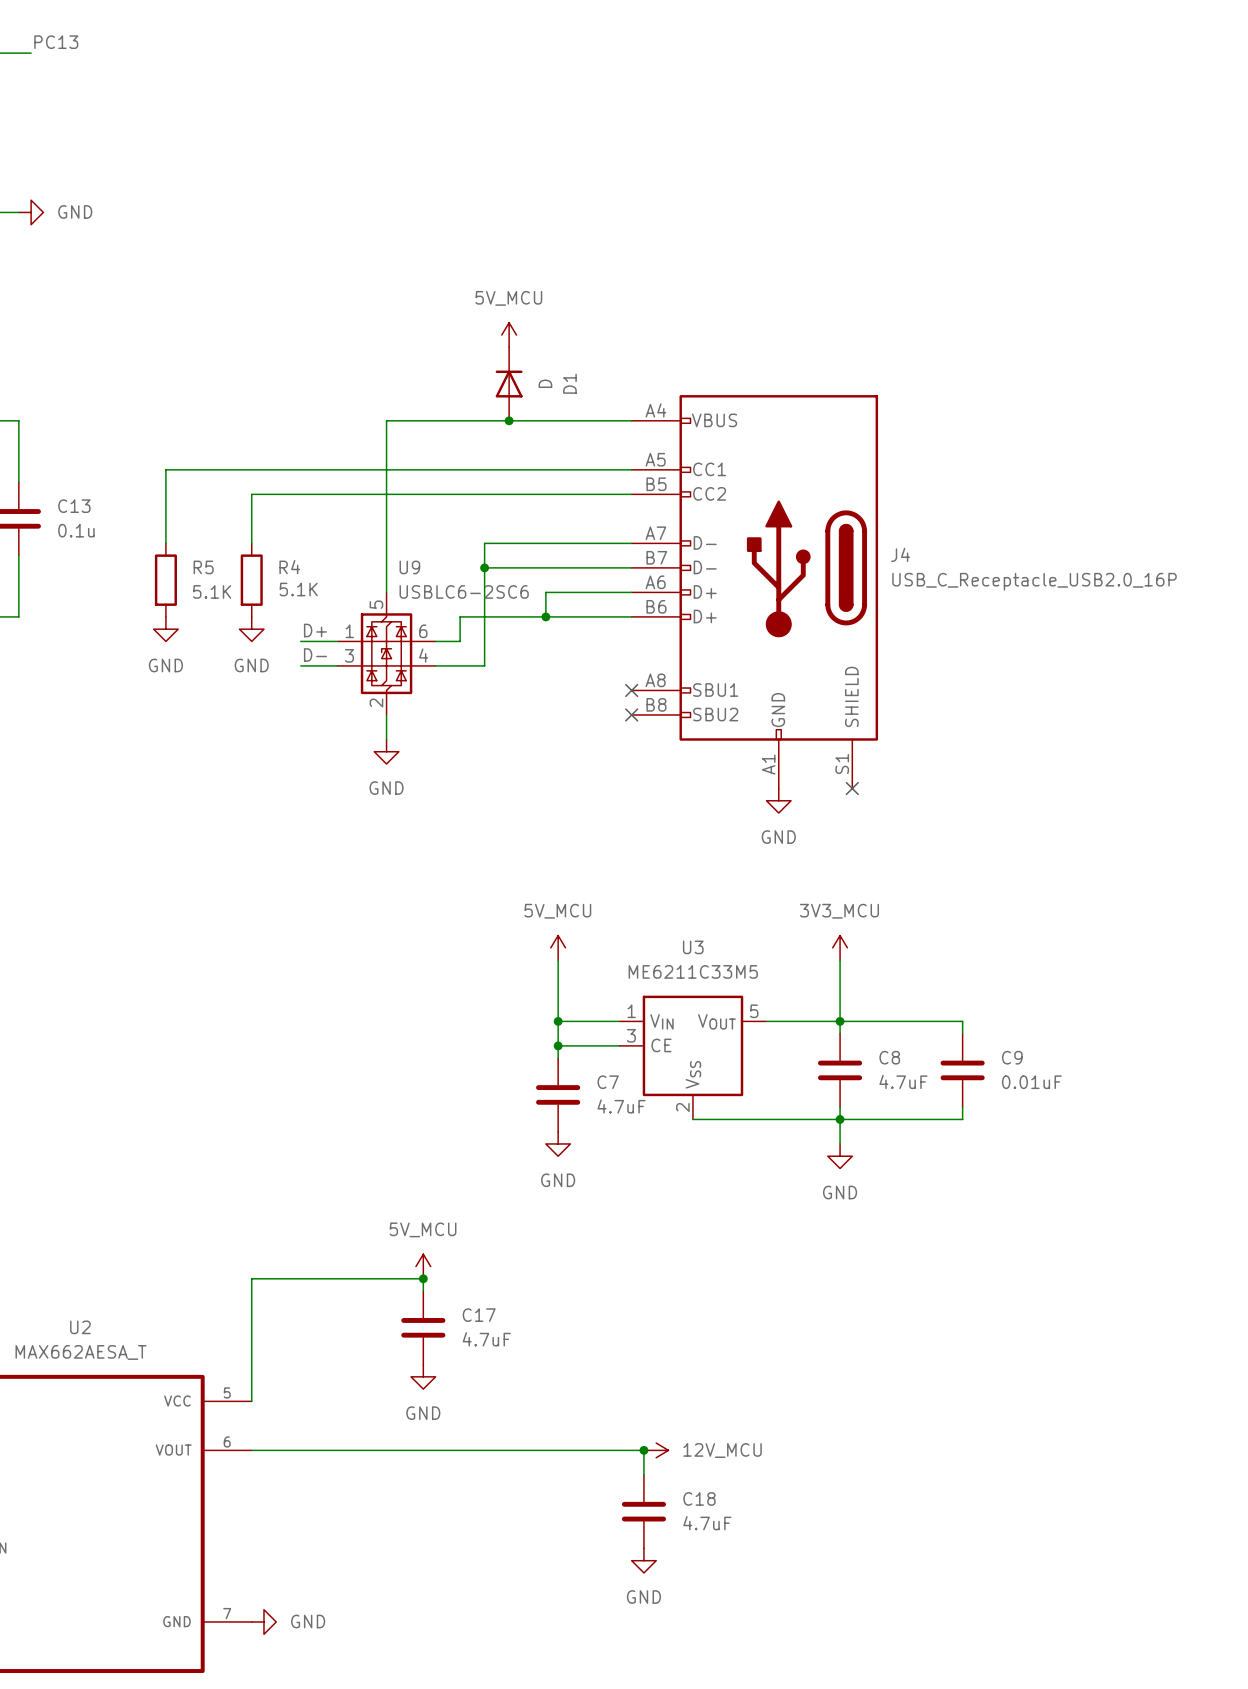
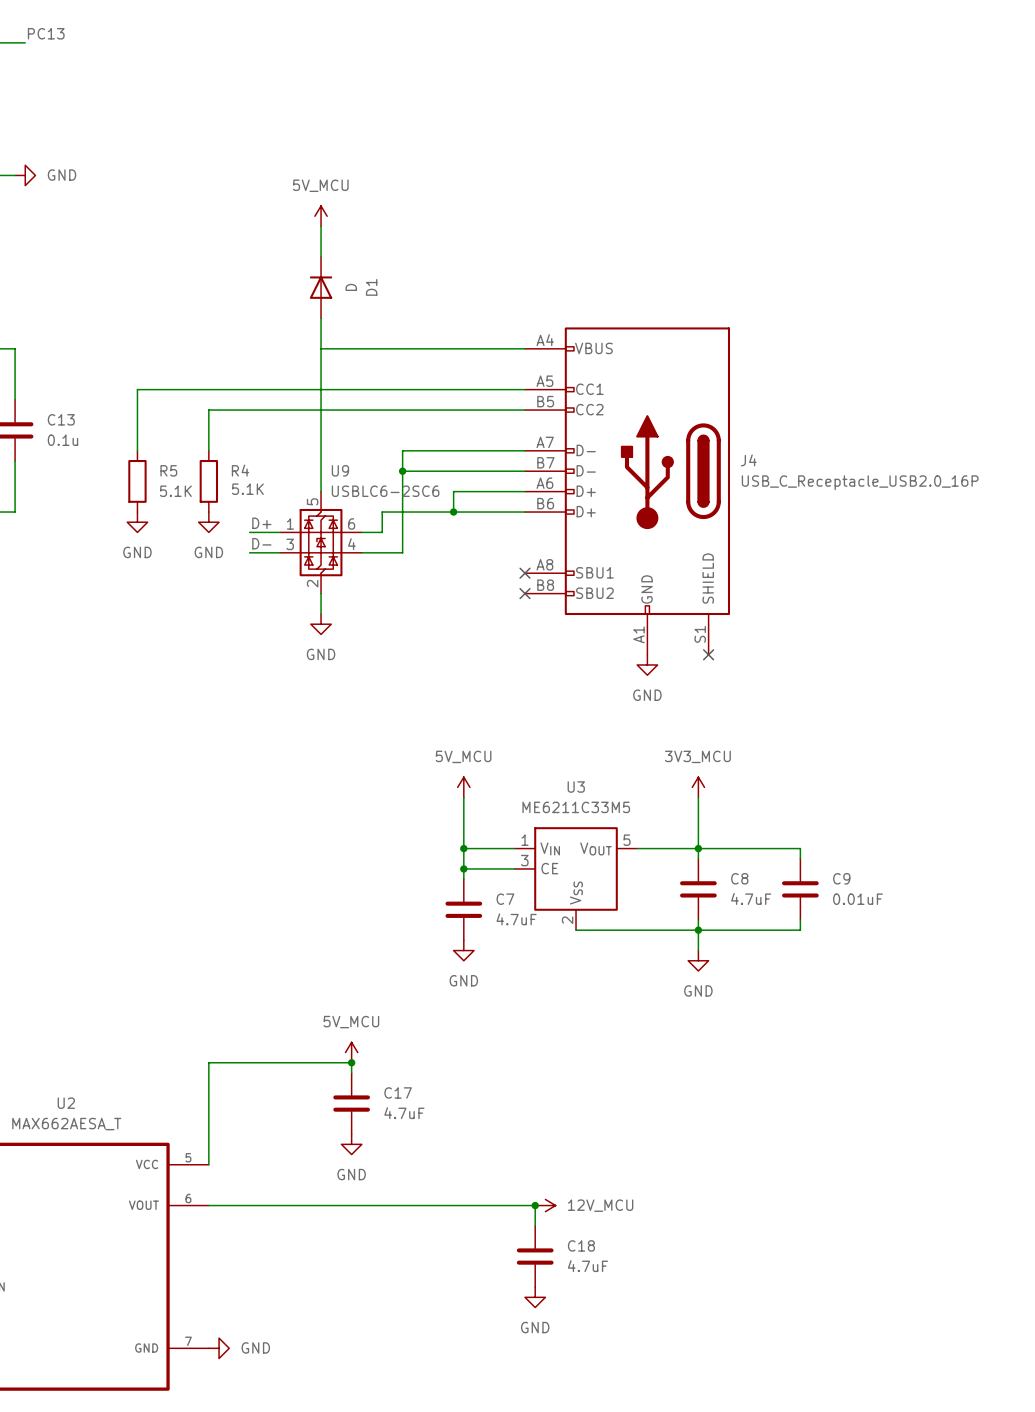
wire: none -> (321, 226) (321, 257)
power symbol position: 5V_MCU (509, 335) -> 5V_MCU (321, 216)
wire: none -> (321, 318) (321, 348)
D1 position: (509, 384) -> (321, 287)
junction: (509, 420) -> none

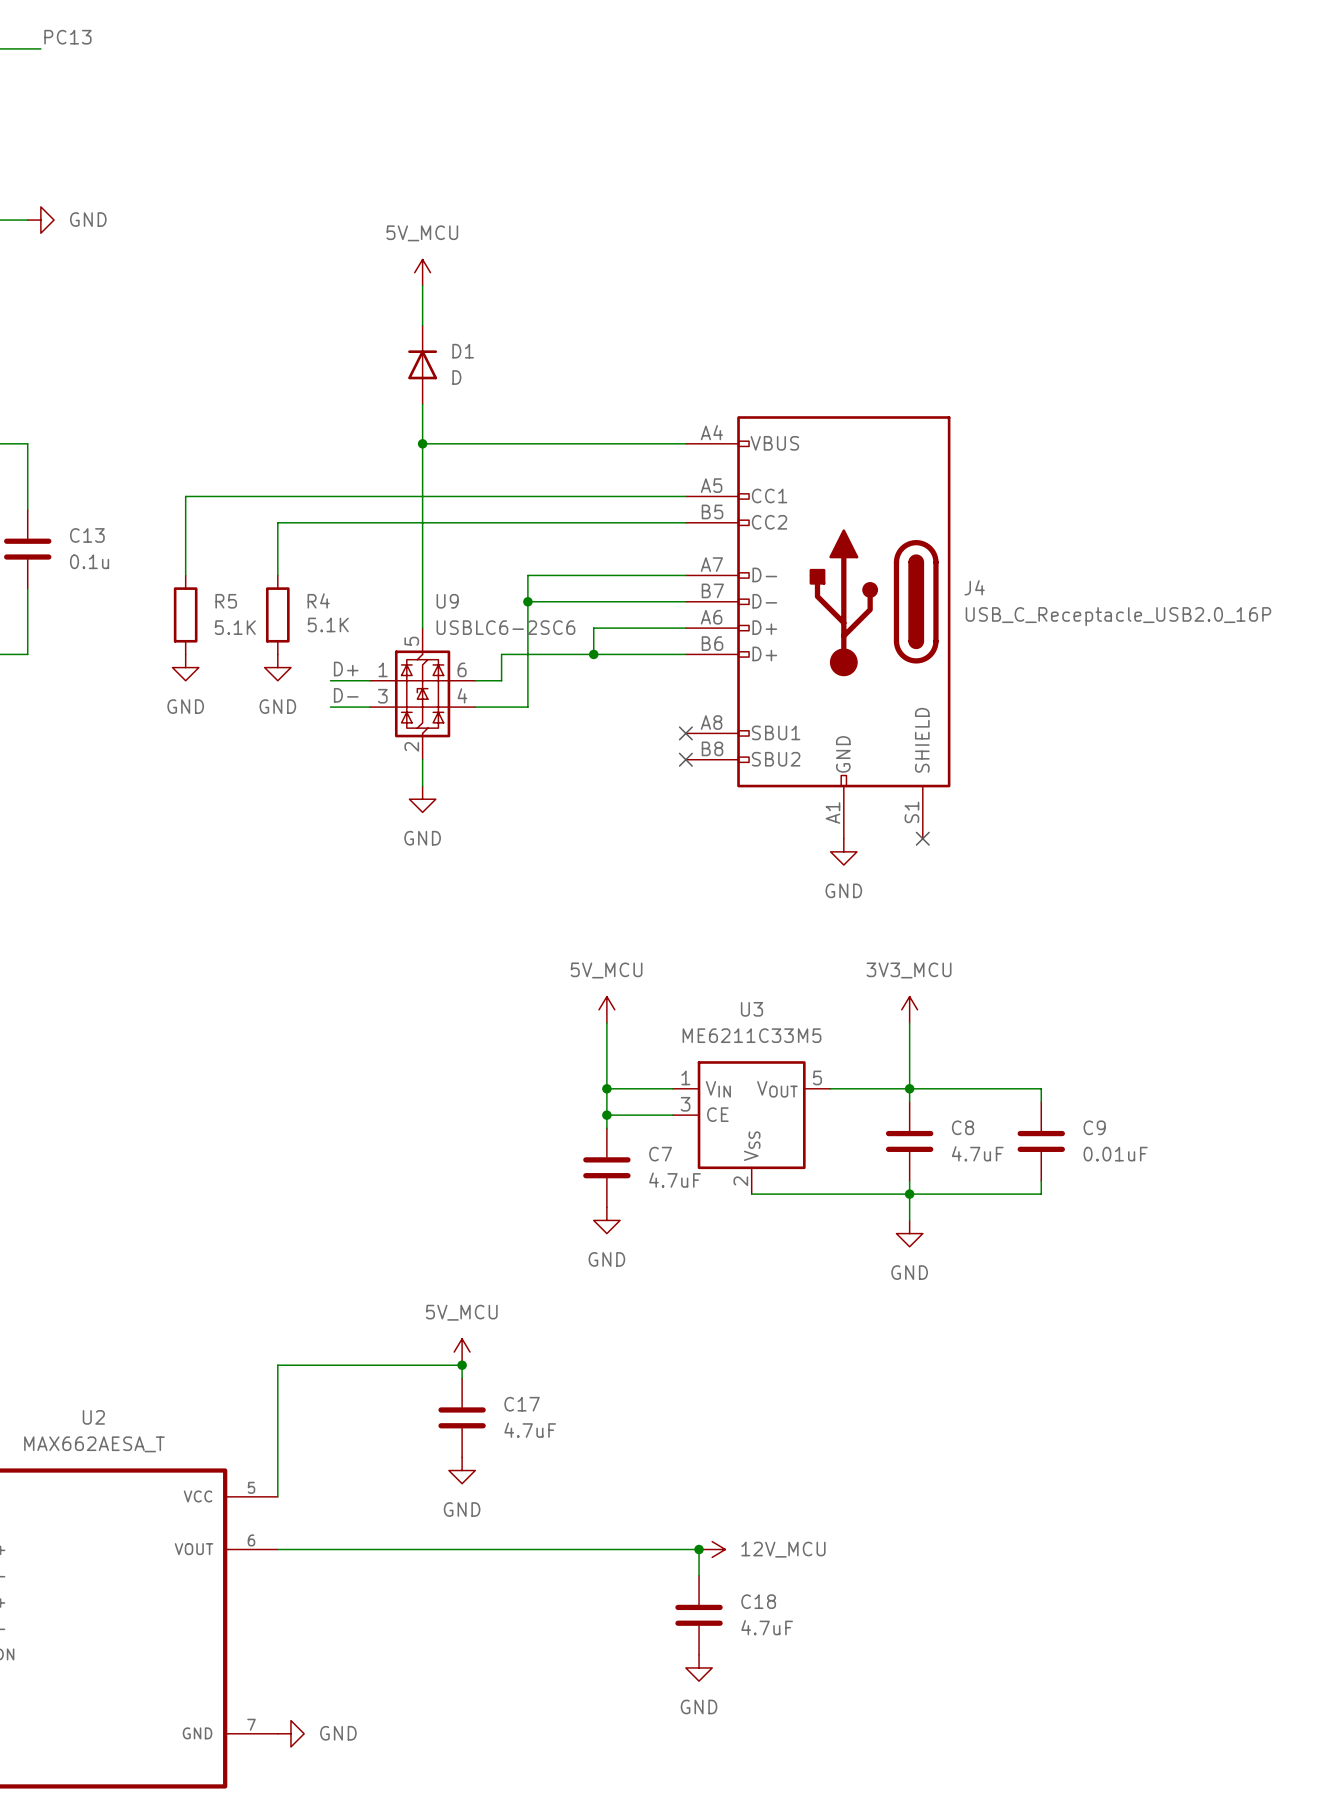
D1 value rotation: 0° (351, 287) -> 90° clockwise (456, 377)
D1 name rotation: 0° (371, 287) -> 90° clockwise (463, 351)
junction: none -> (422, 443)

